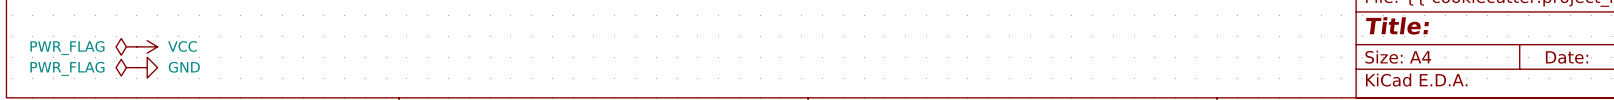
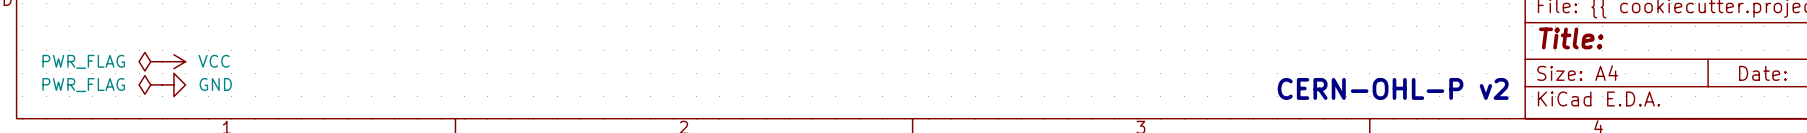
text: none -> CERN-OHL-P v2 (1393, 88)

